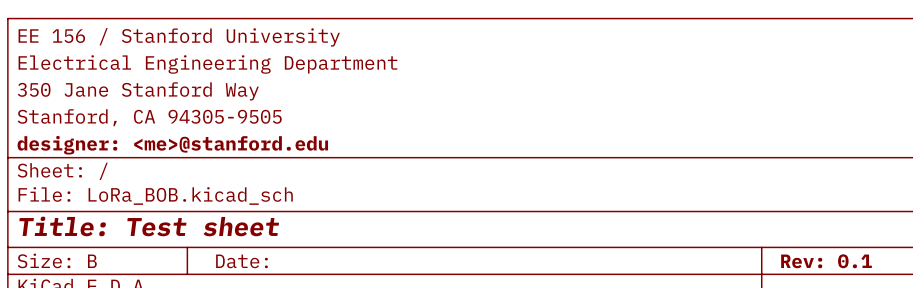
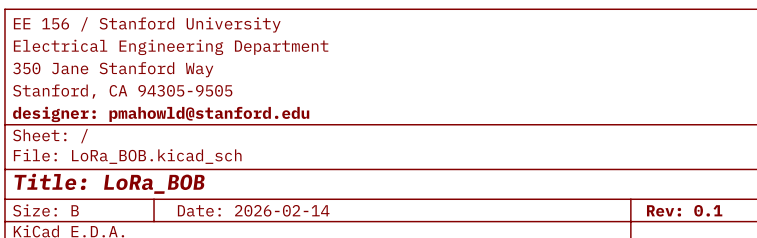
title block: designer: <me>@stanford.edu (172, 145) -> designer: pmahowld@stanford.edu (161, 114)
title block: Title: Test sheet (149, 226) -> Title: LoRa_BOB (109, 183)
title block: Date: (241, 261) -> Date: 2026-02-14 (253, 210)

